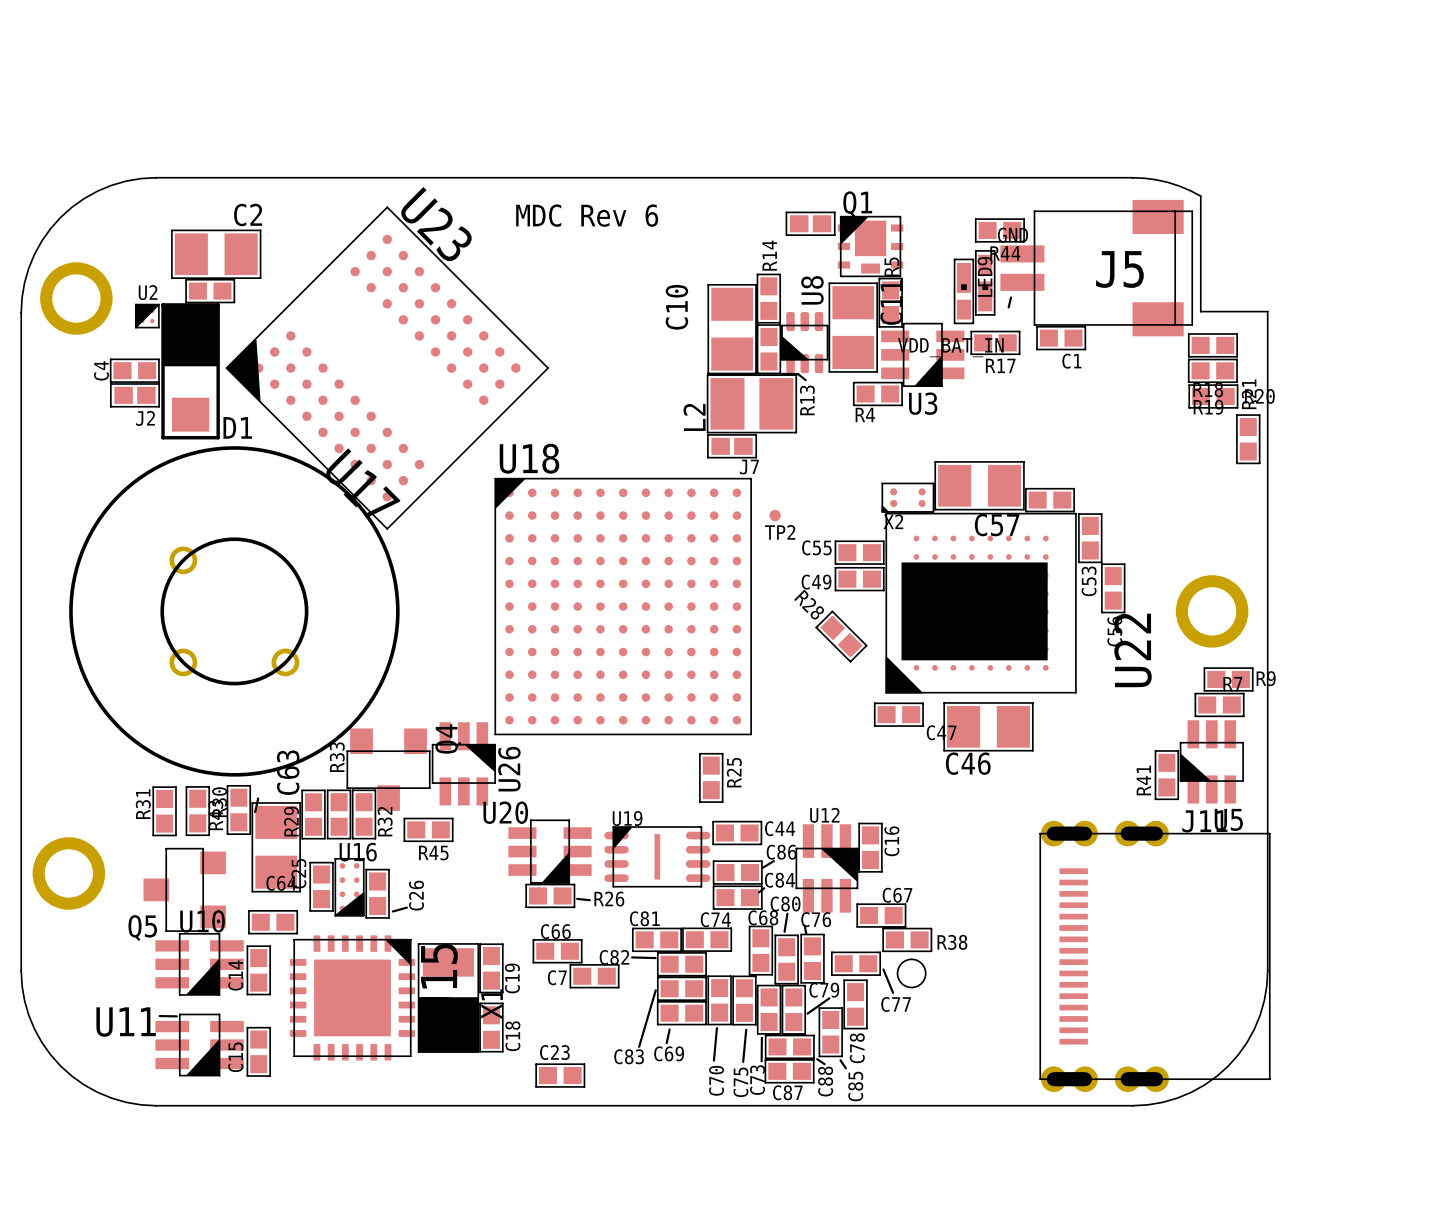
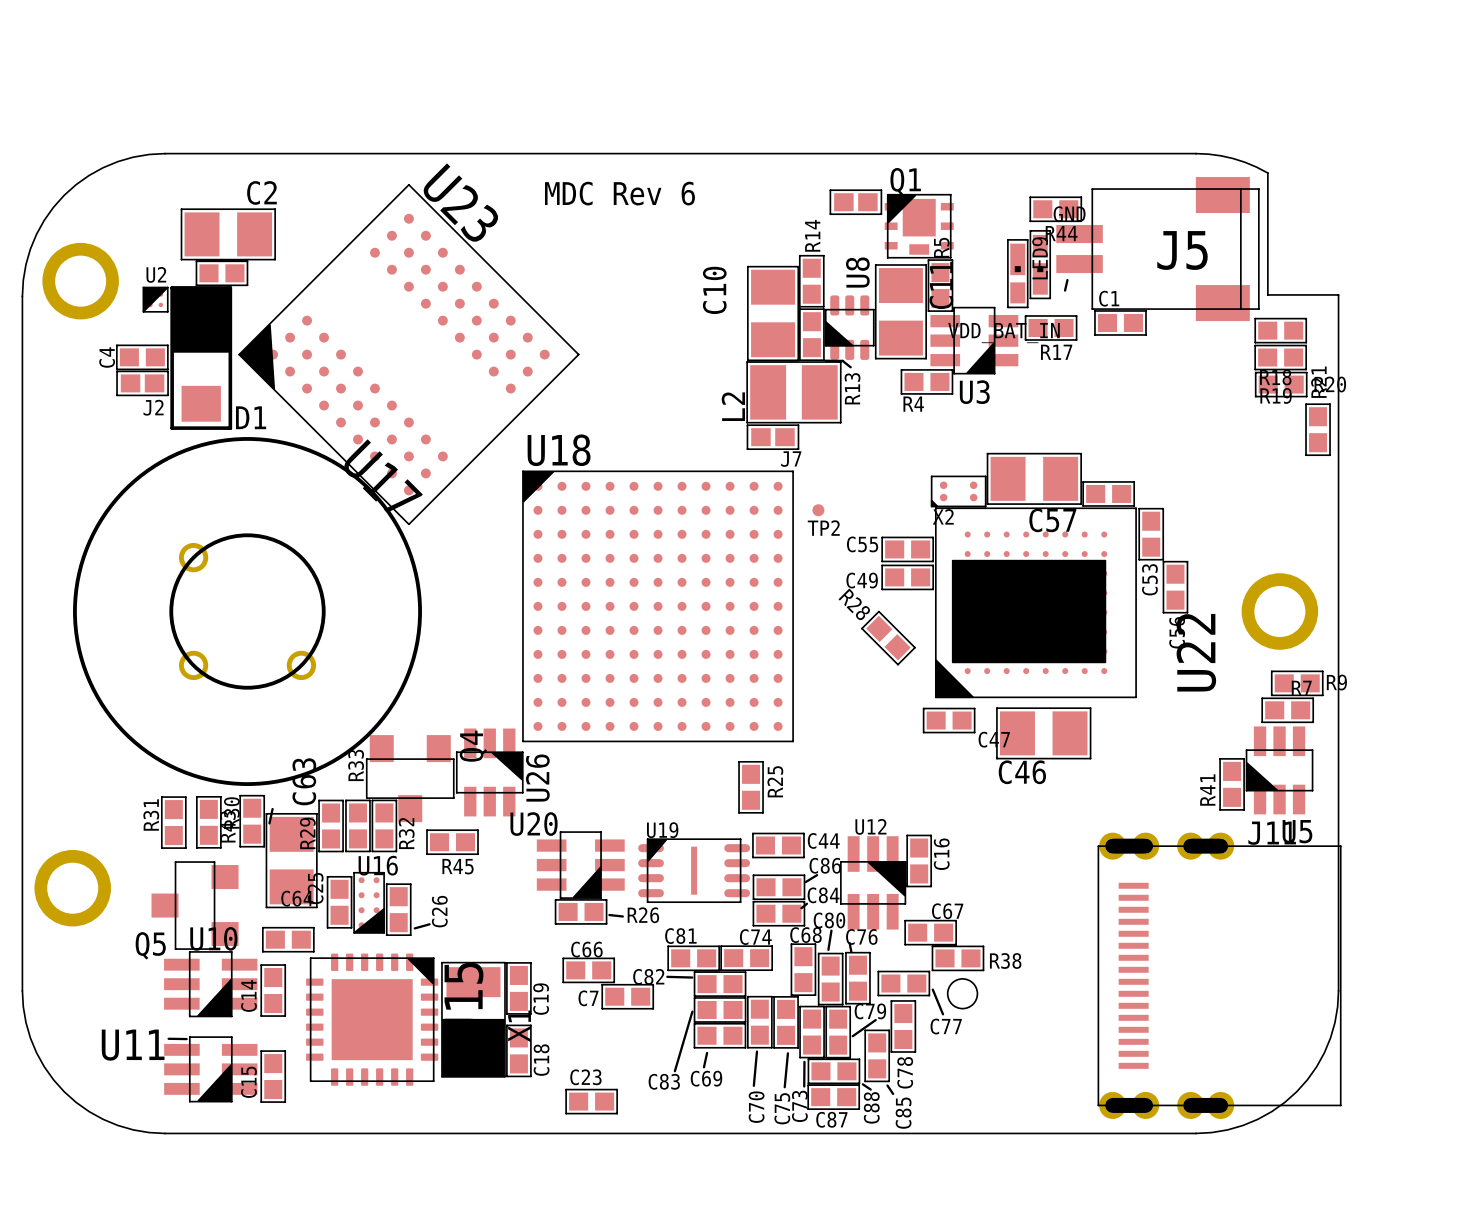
C1 name position: C1 (1071, 361) -> C1 (1109, 298)

